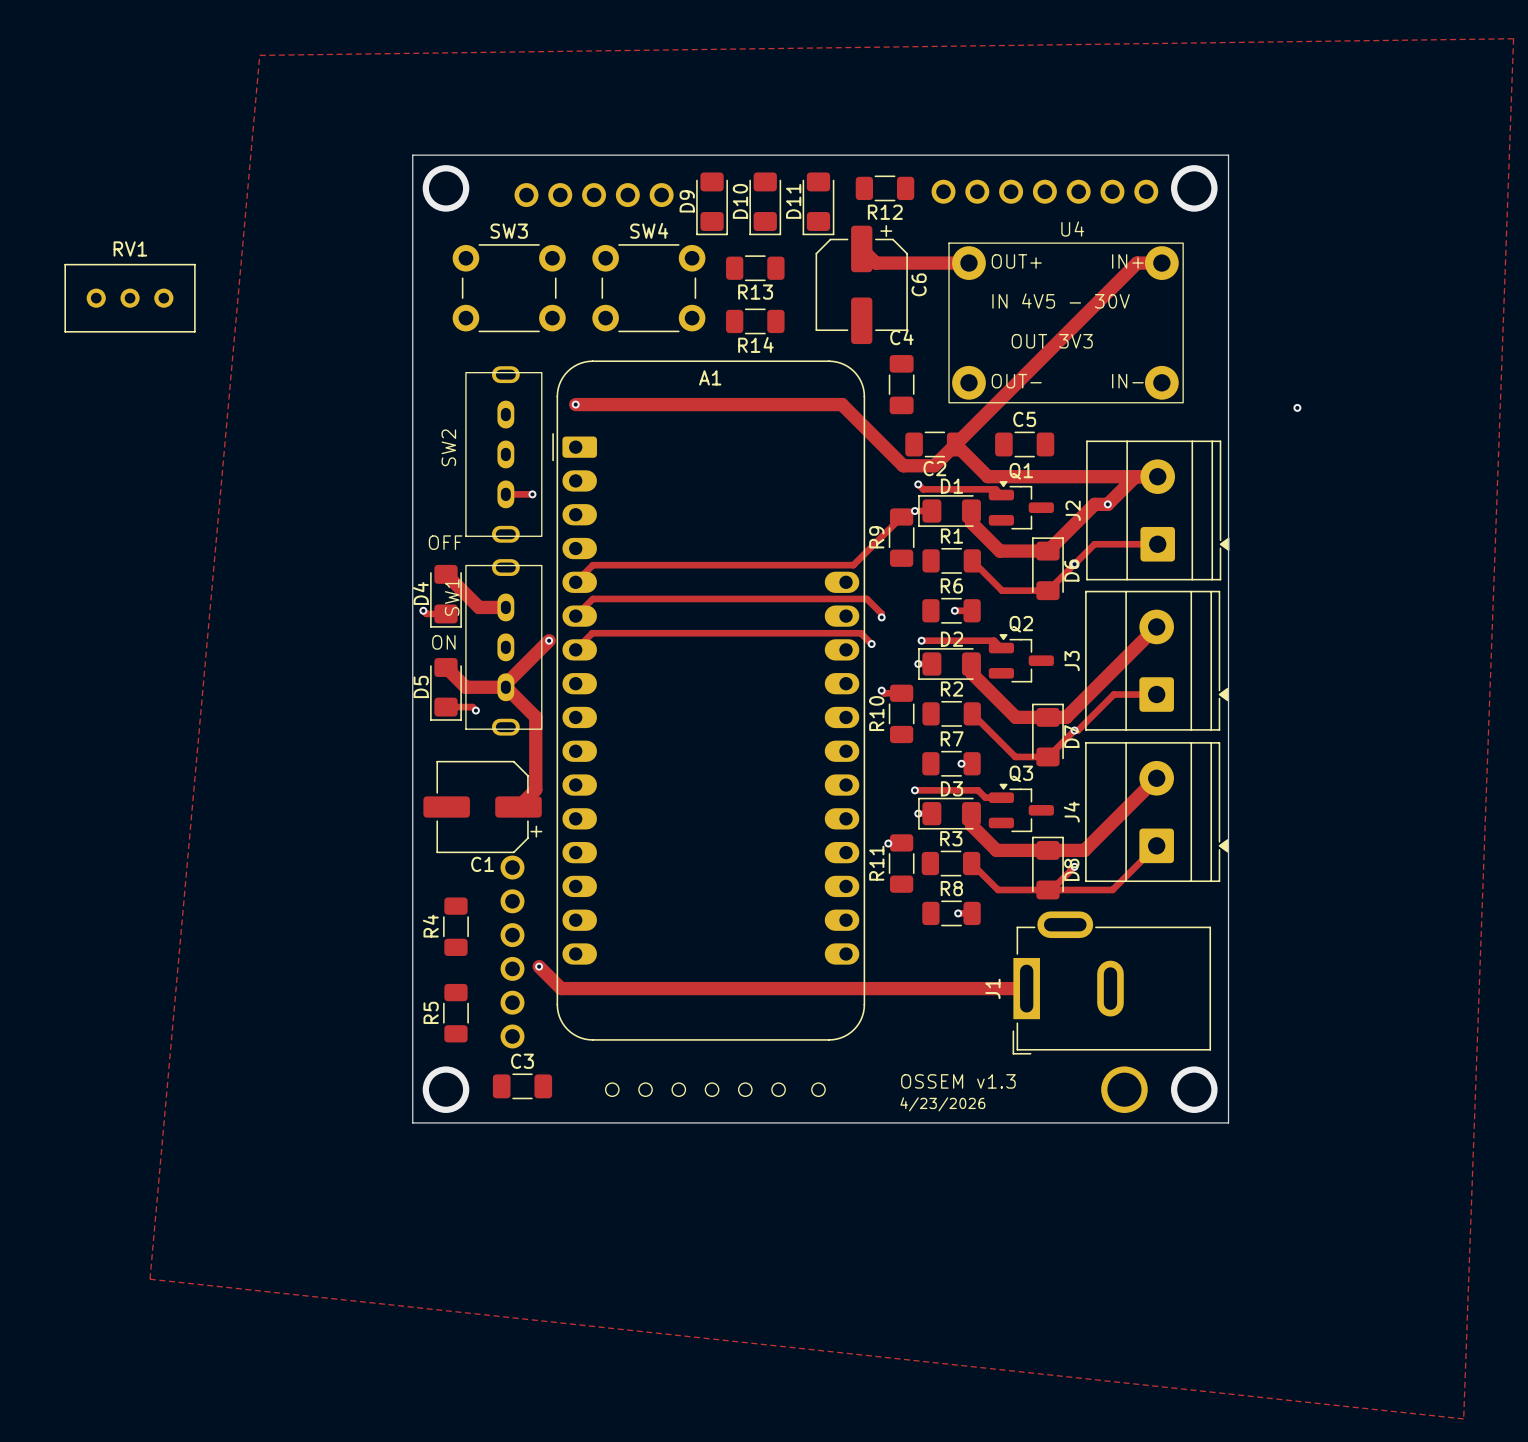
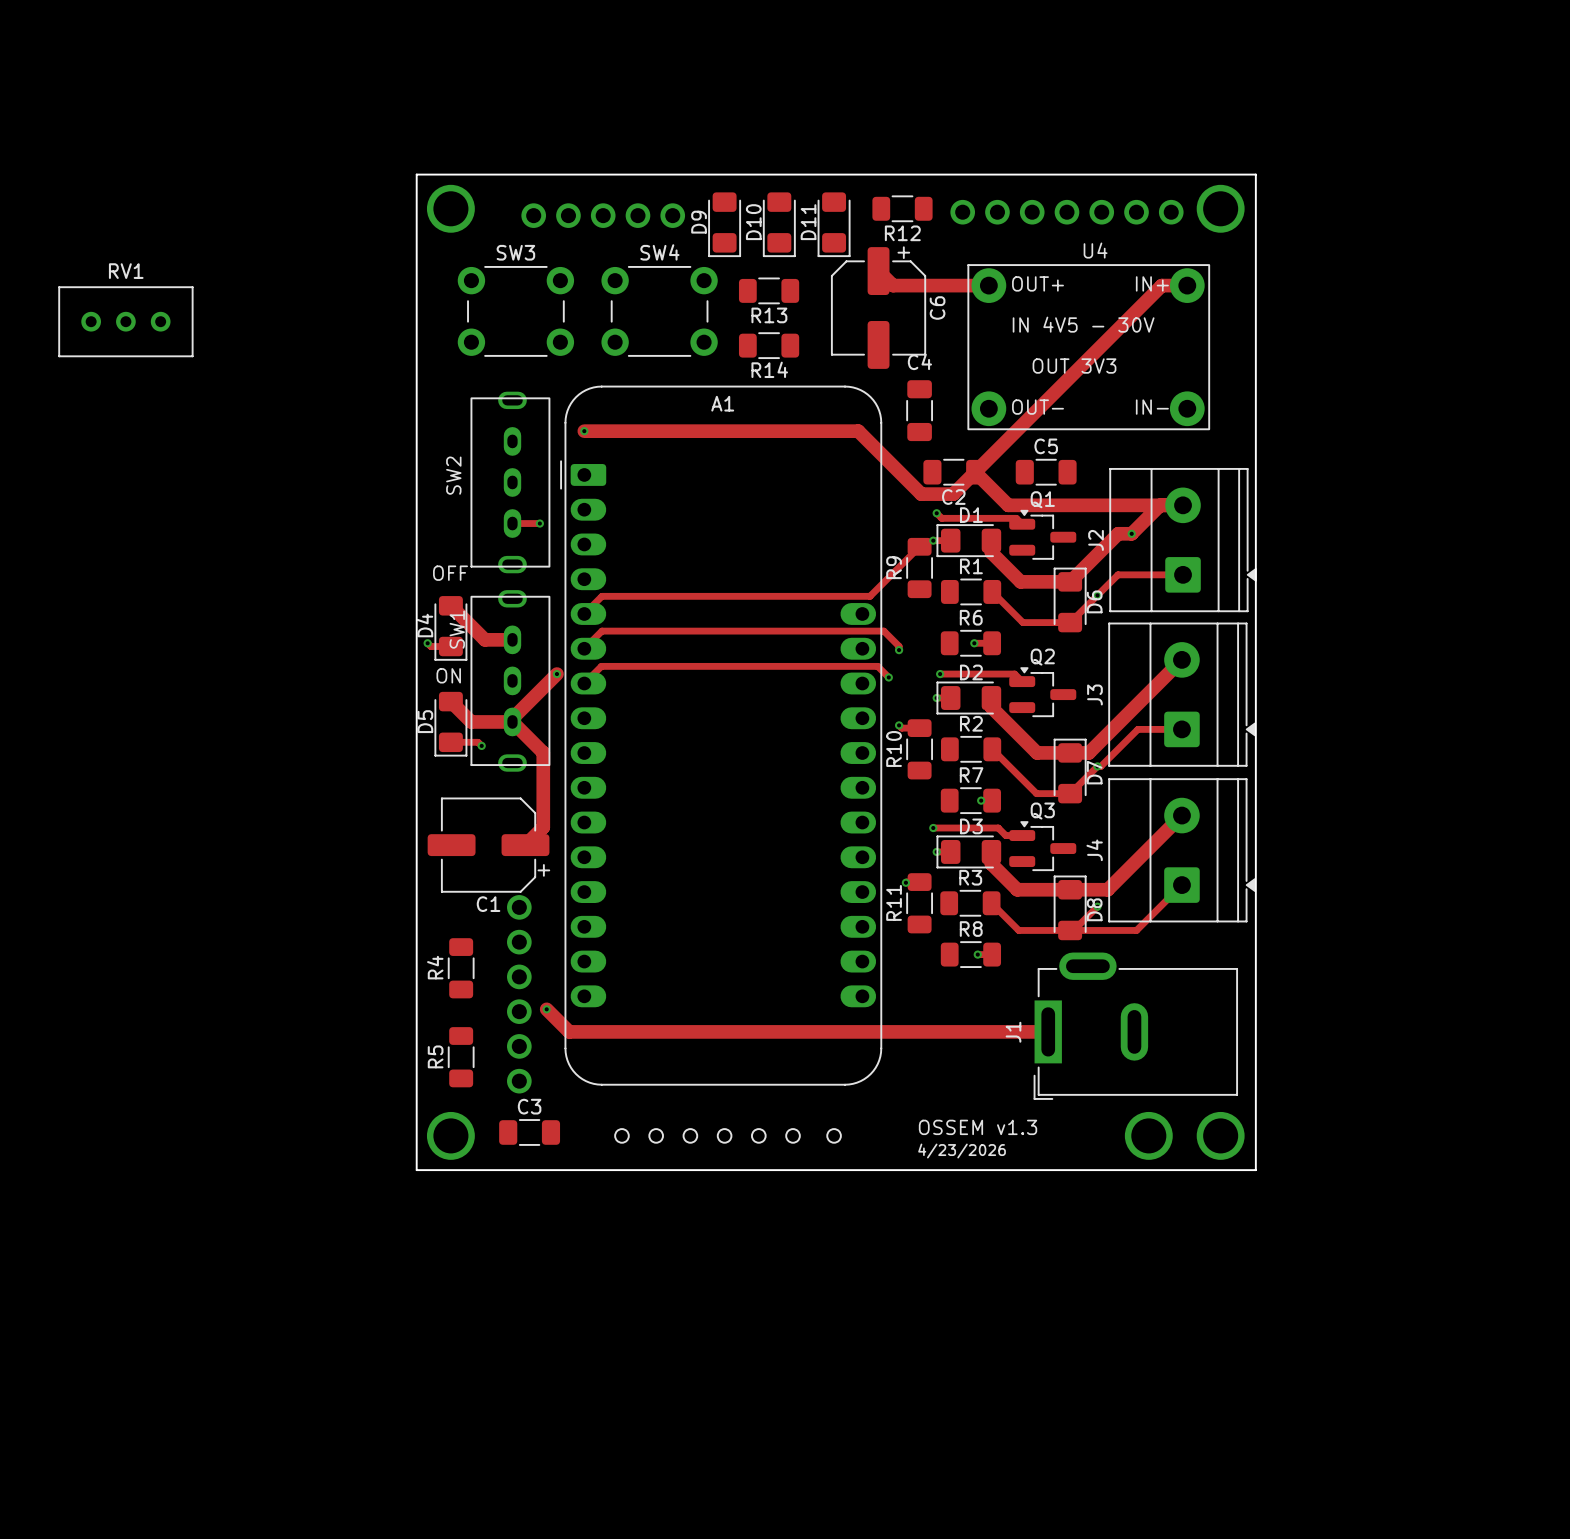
zone outline: (1513, 38) (259, 55) (150, 1279) (1463, 1418) (1513, 38) -> none
via: (1297, 407) -> none

